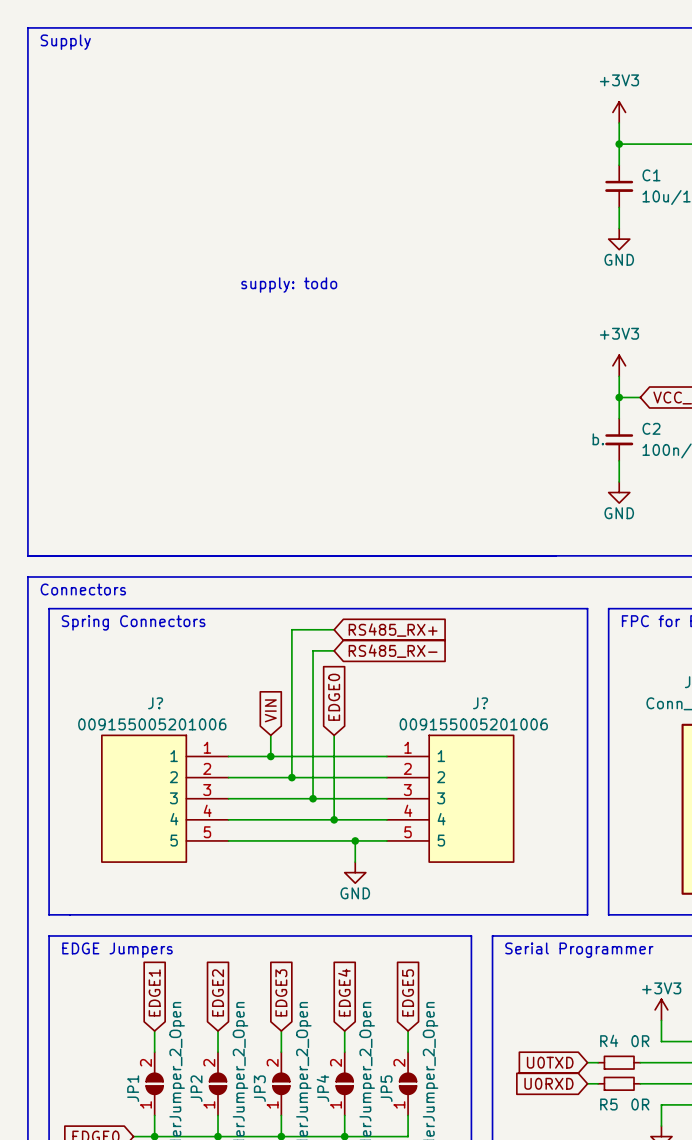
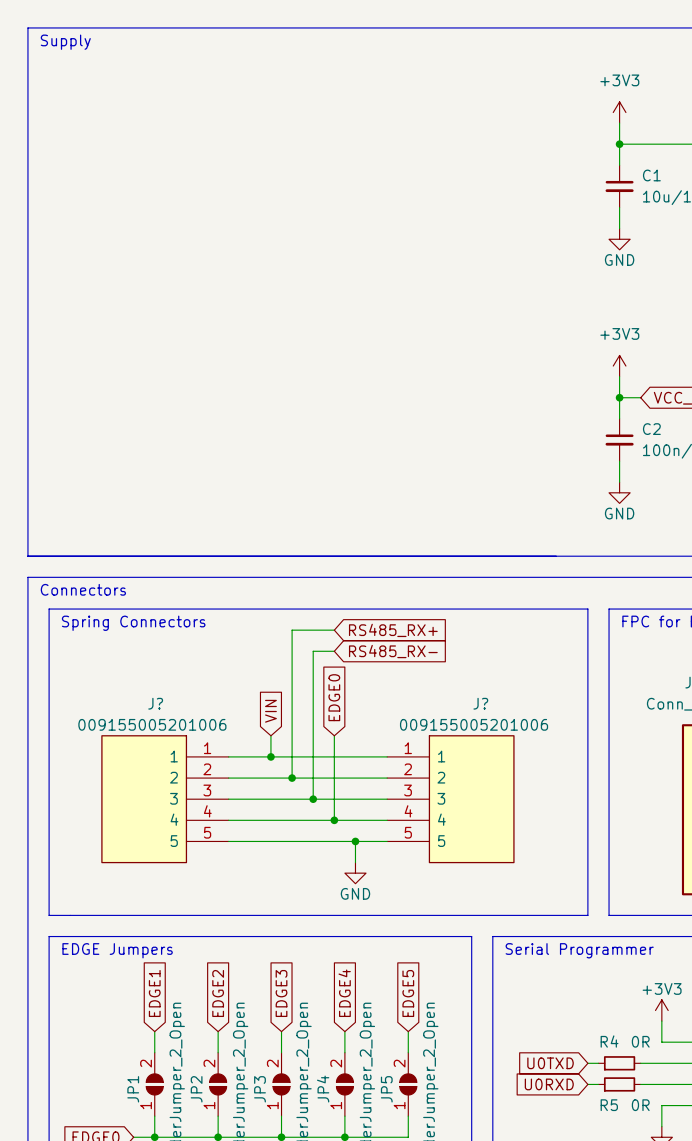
text: supply: todo (289, 285) -> none
C2 text: b. (598, 439) -> none

